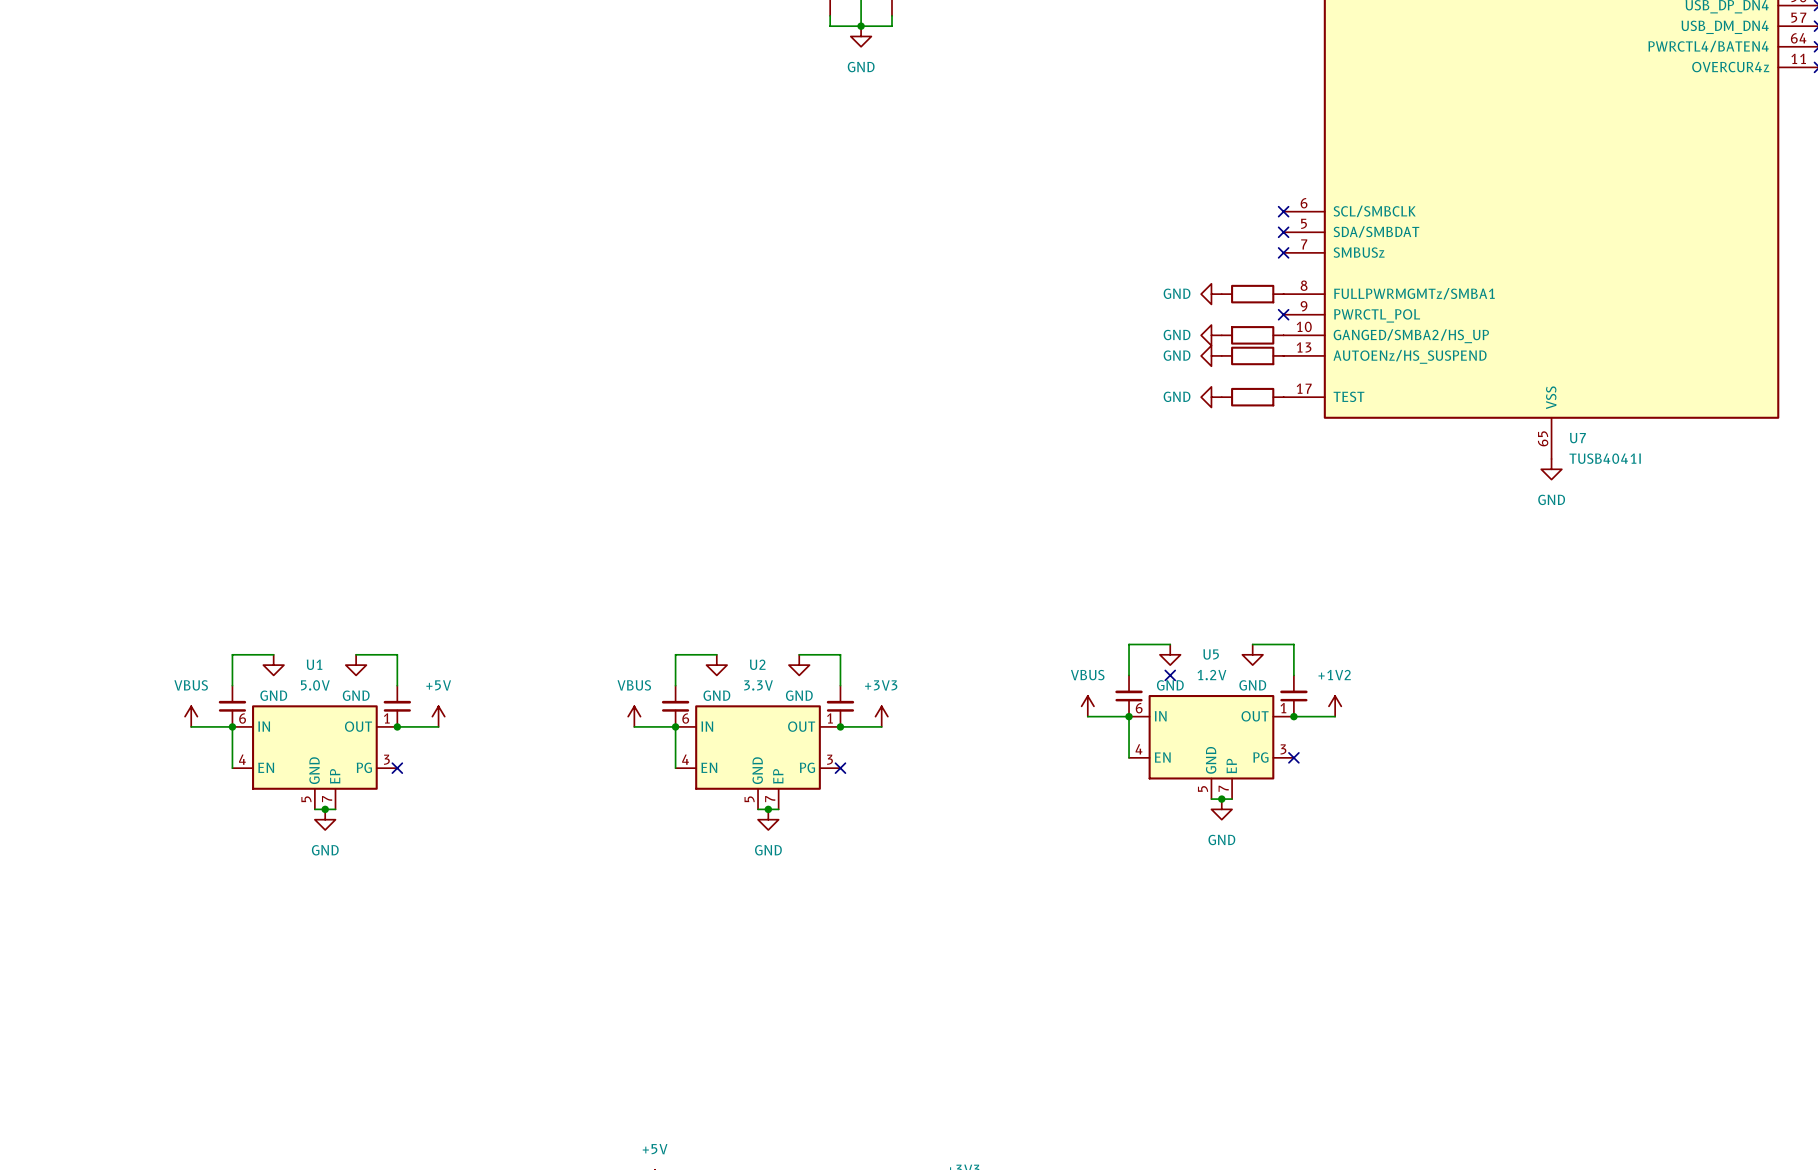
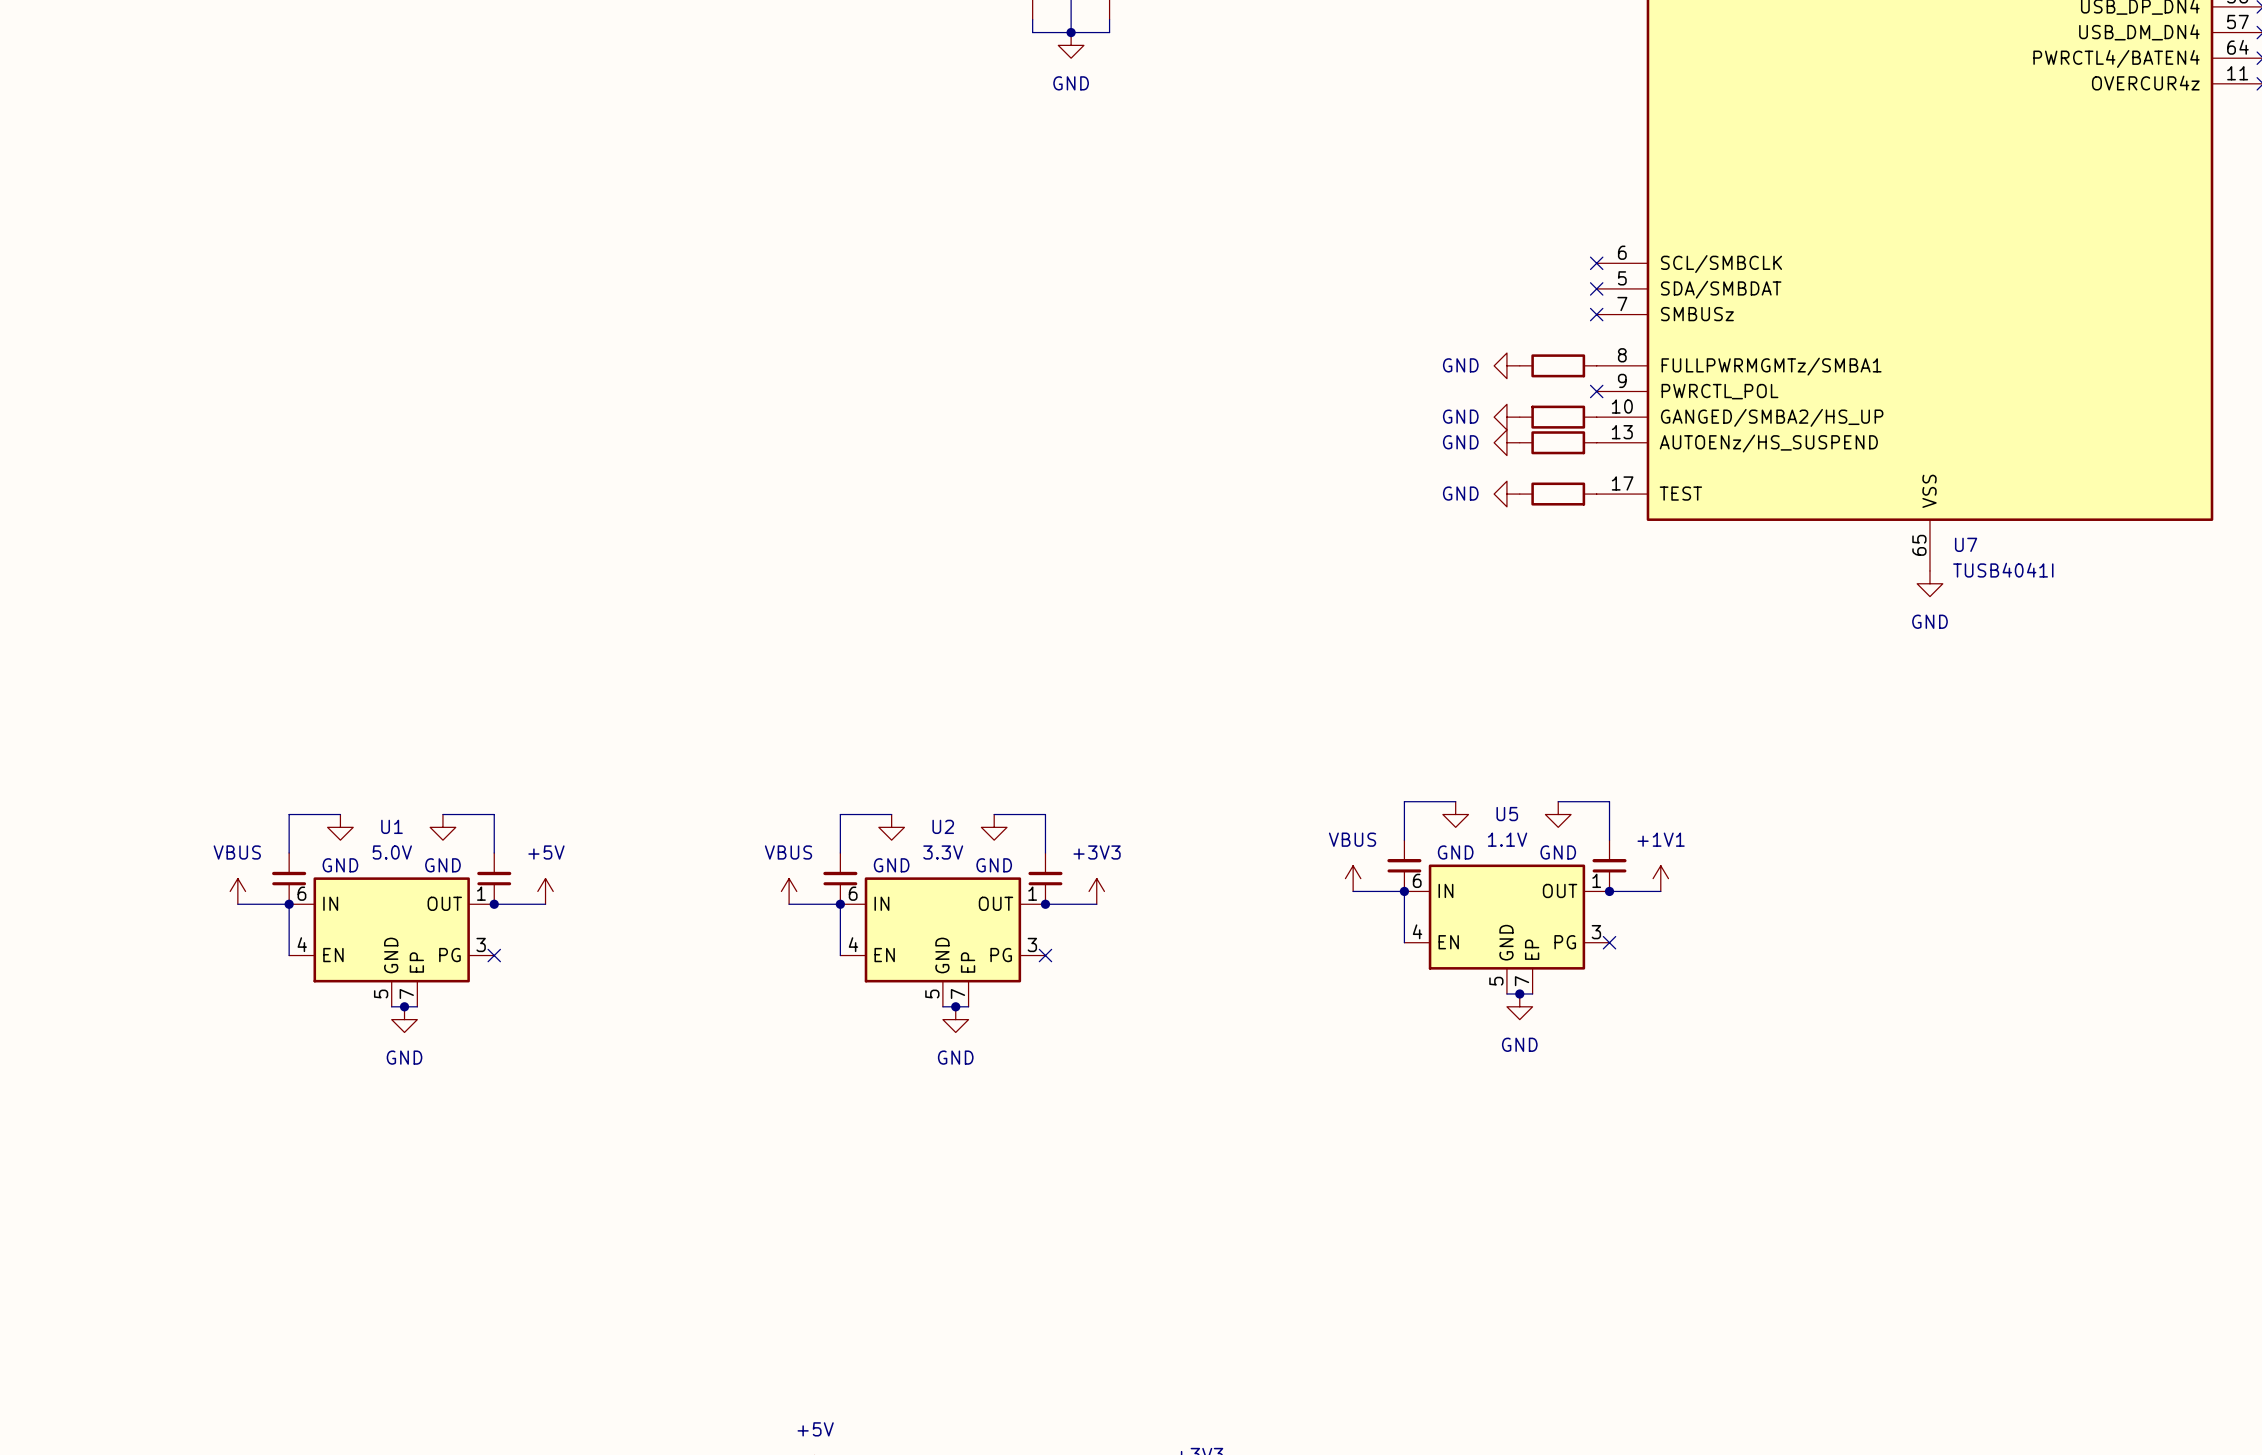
no-connect mark: (1170, 675) -> none
U5 value: 1.2V (1211, 675) -> 1.1V (1507, 839)
power symbol: +1V2 (1335, 706) -> +1V1 (1660, 878)

